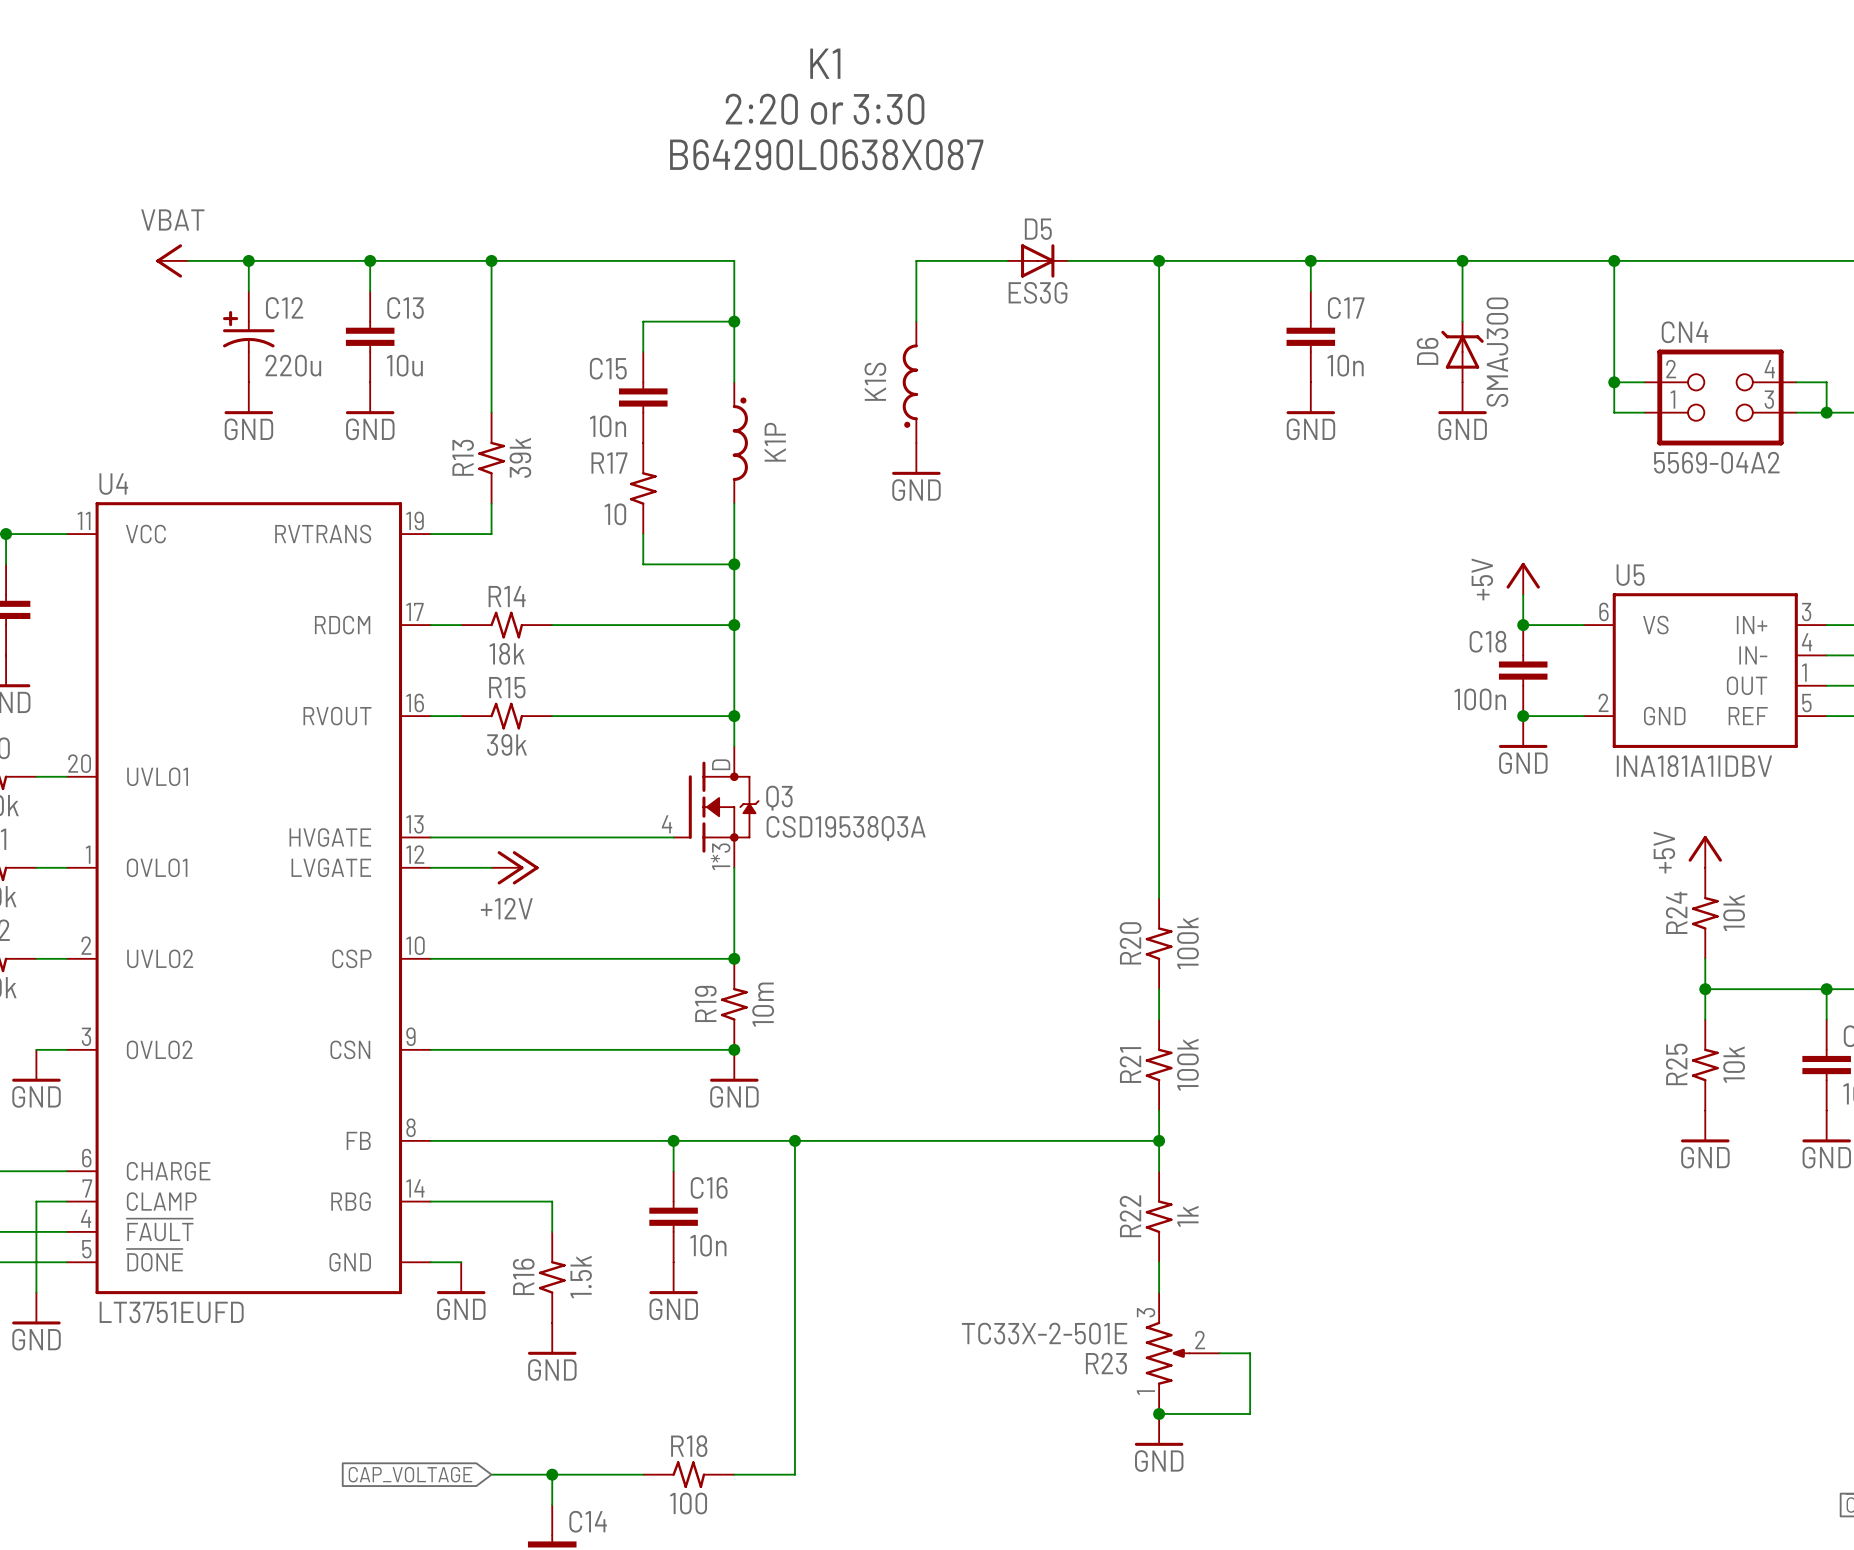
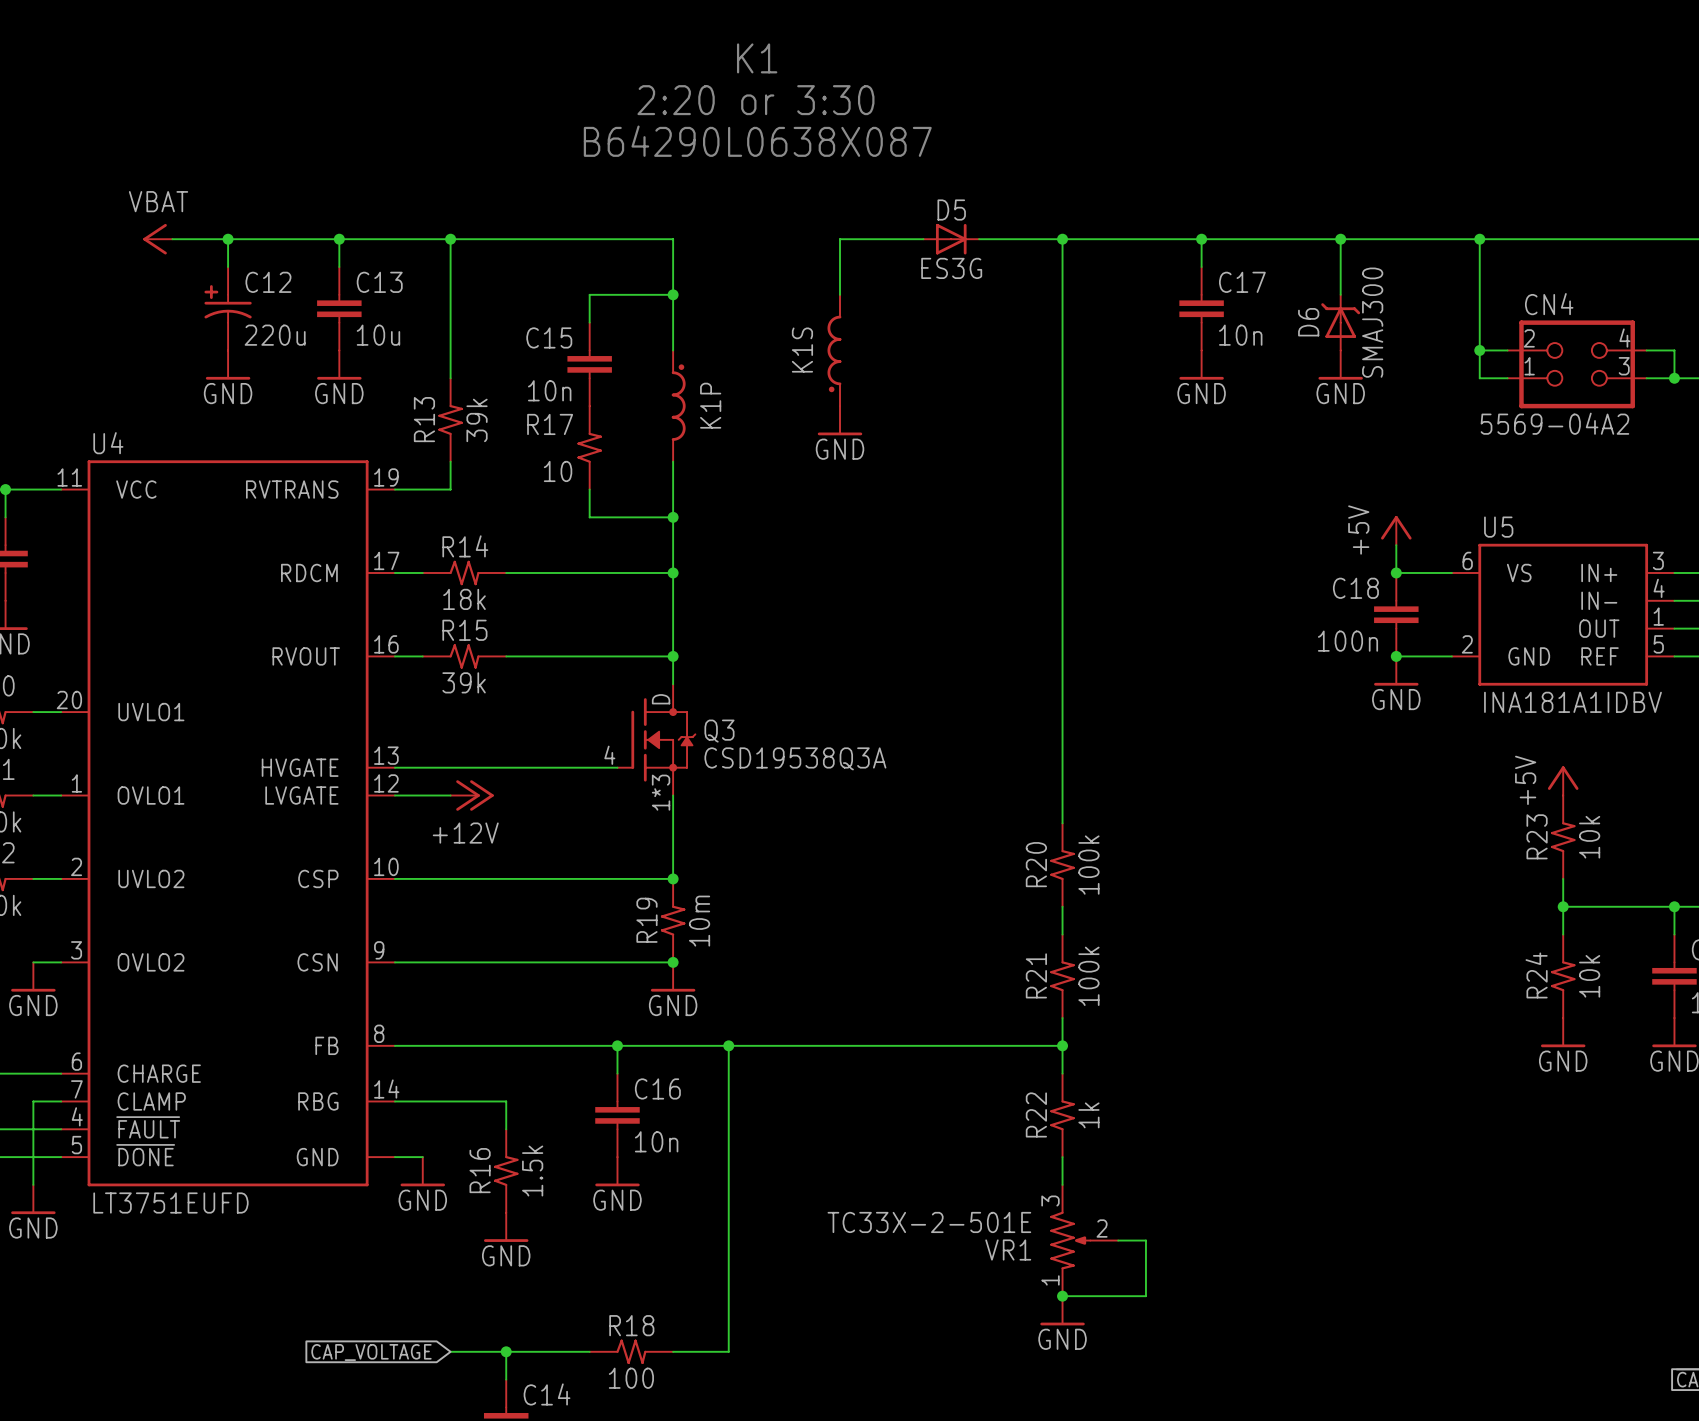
R24 name: R24 (1676, 912) -> R23 (1537, 836)
R25 name: R25 (1676, 1064) -> R24 (1536, 975)
R23 name: R23 (1106, 1363) -> VR1 (1008, 1250)

